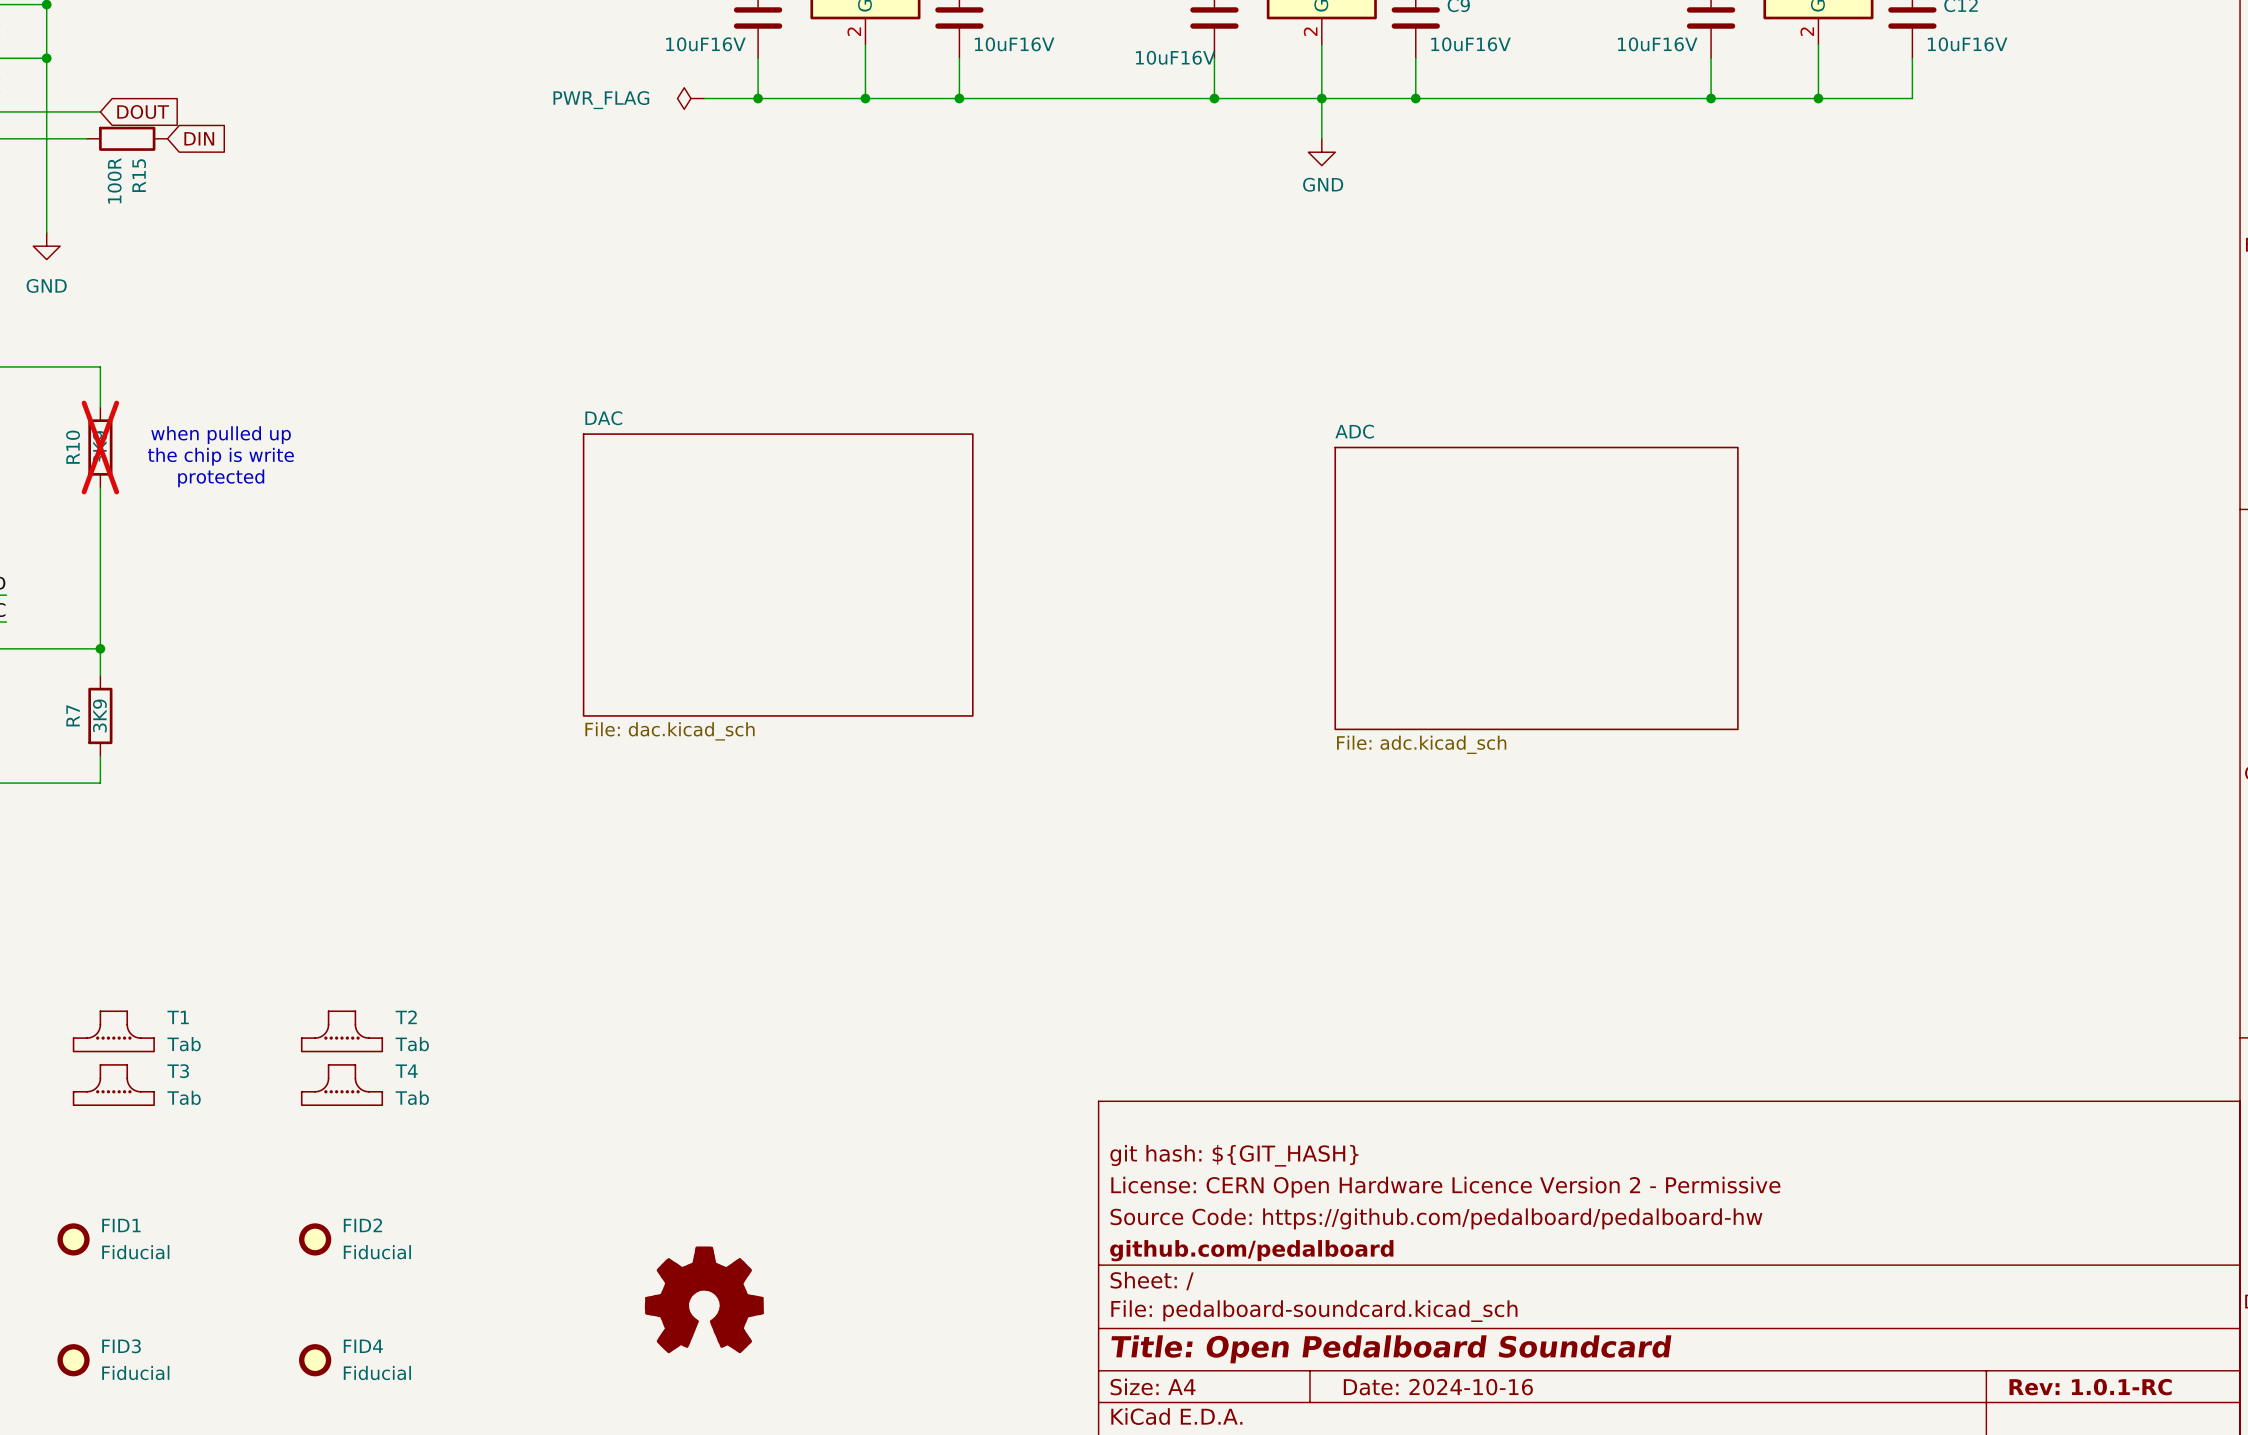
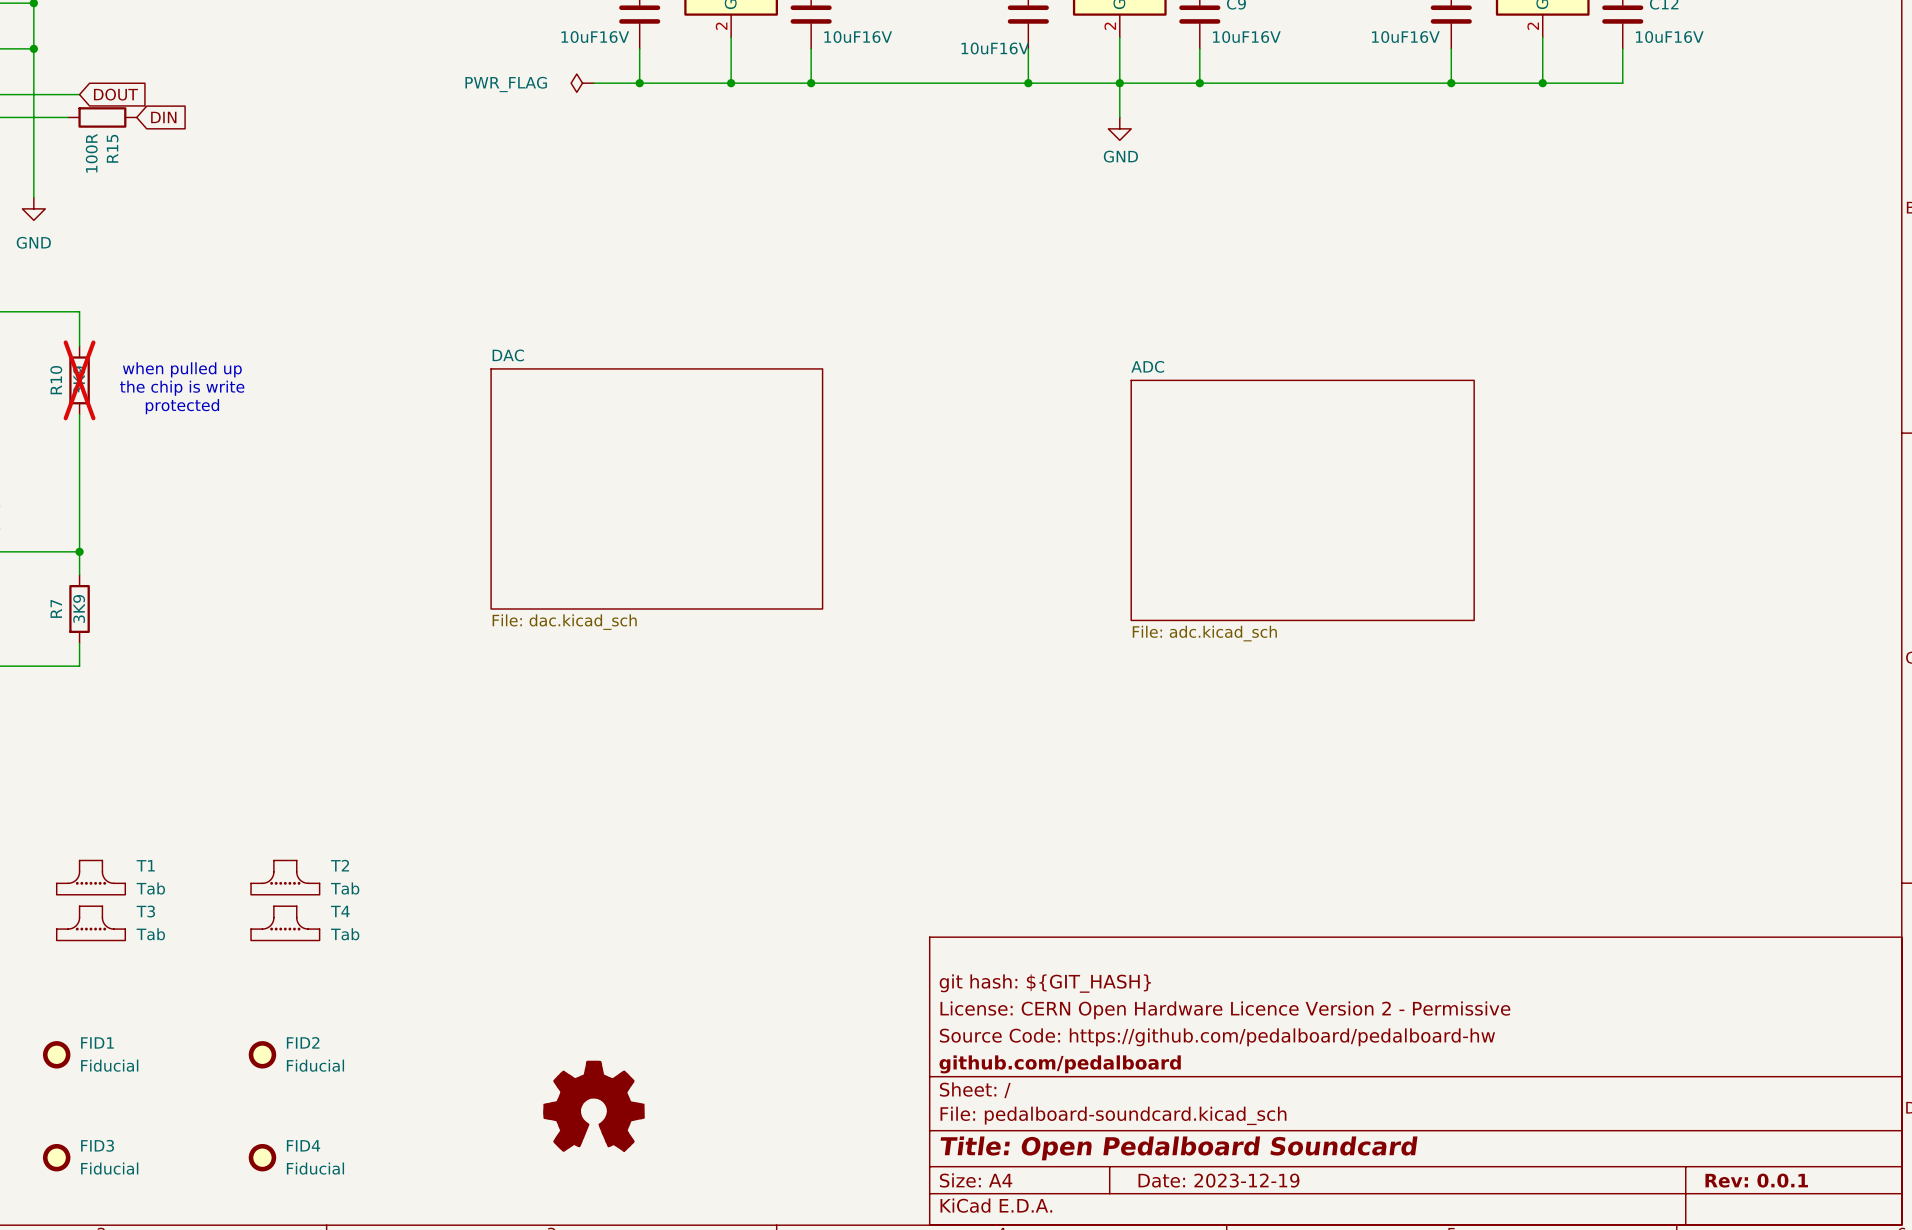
title block: Date: 2024-10-16 (1438, 1387) -> Date: 2023-12-19 (1218, 1180)
title block: Rev: 1.0.1-RC (2090, 1387) -> Rev: 0.0.1 (1756, 1180)

